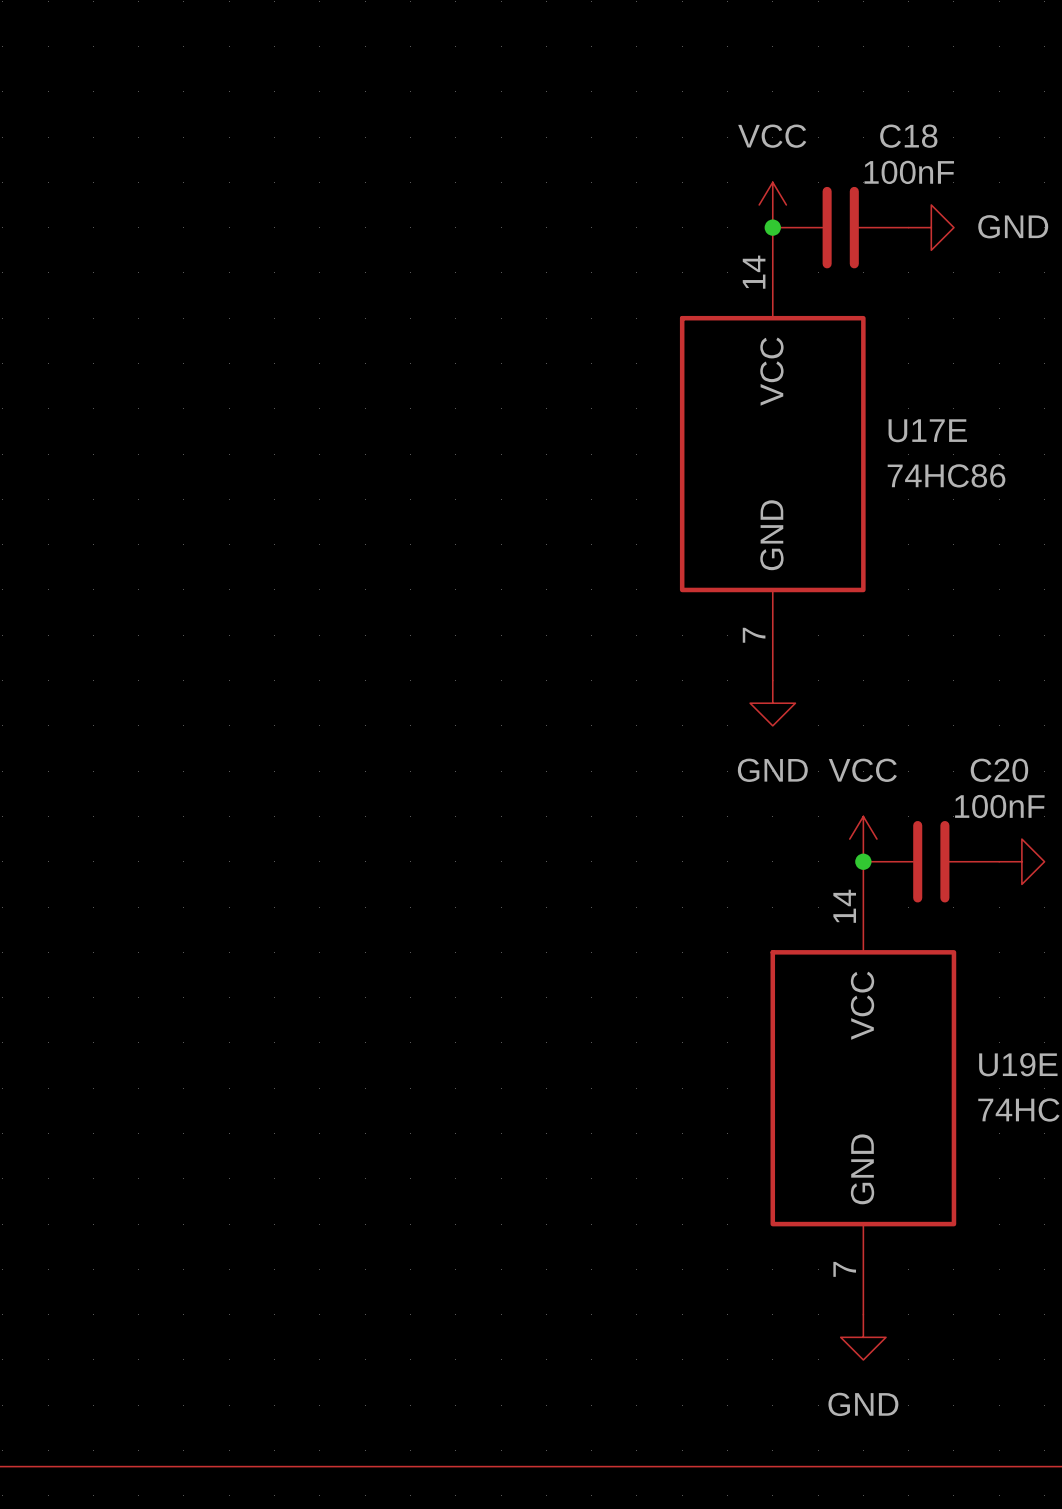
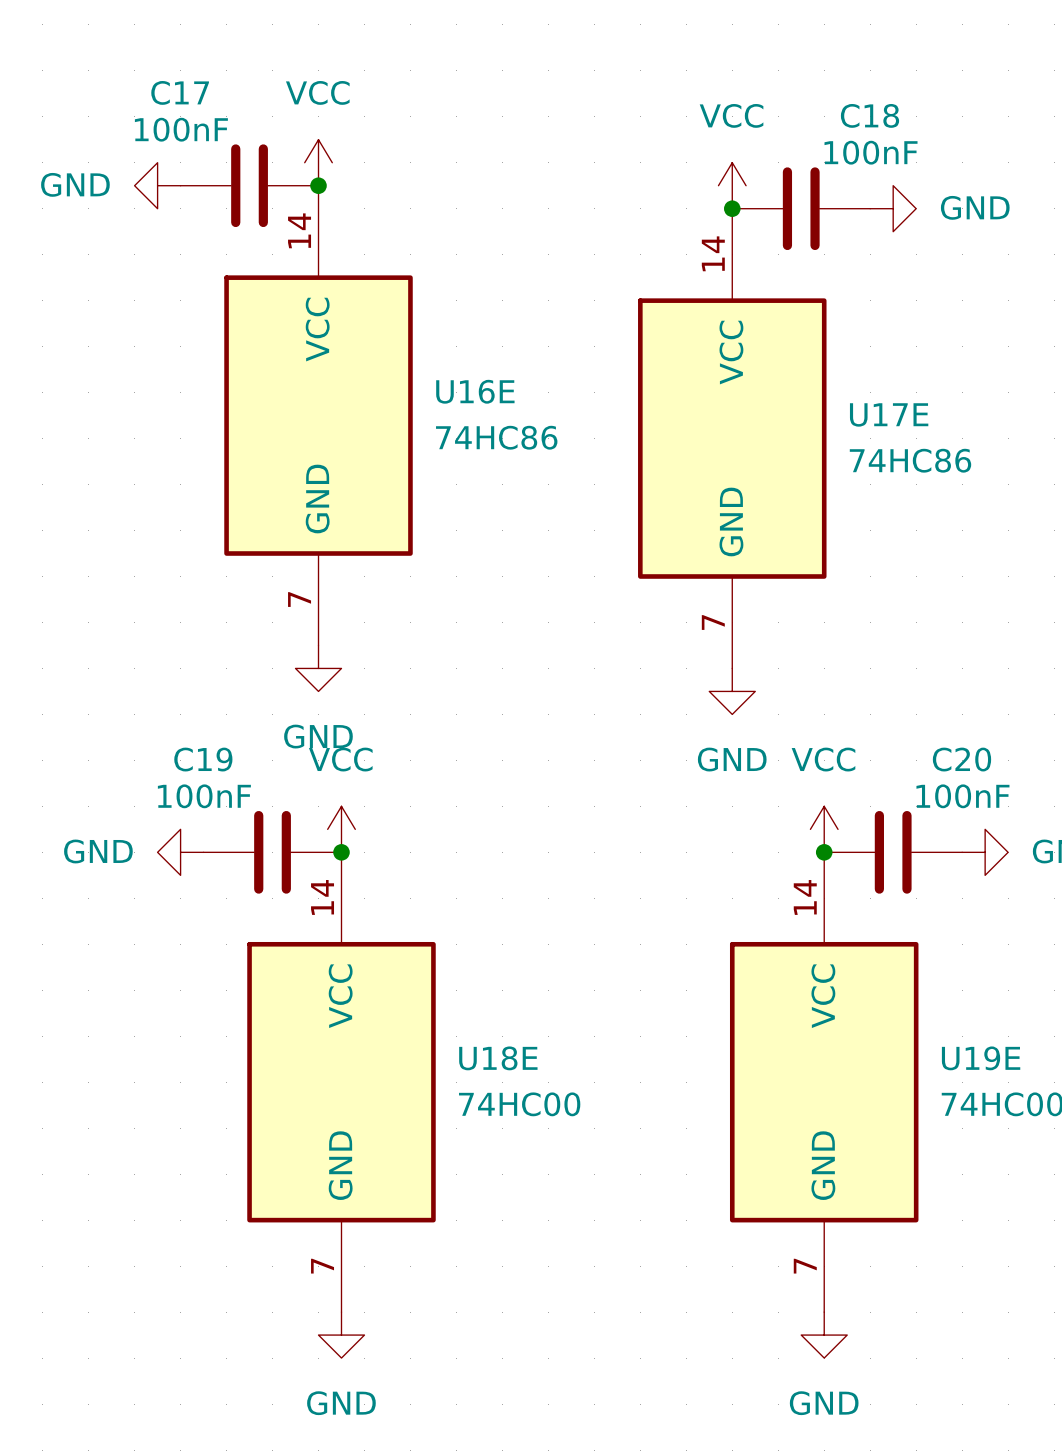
power symbol: none -> VCC (318, 162)
power symbol: none -> GND (157, 185)
C17: none -> 100nF (249, 185)
junction: none -> (318, 185)
U16E: none -> 74HC86 (318, 415)
power symbol: none -> GND (318, 668)
power symbol: none -> VCC (341, 829)
power symbol: none -> GND (180, 852)
C19: none -> 100nF (272, 852)
junction: none -> (341, 852)
U18E: none -> 74HC00 (341, 1082)
power symbol: none -> GND (341, 1335)

